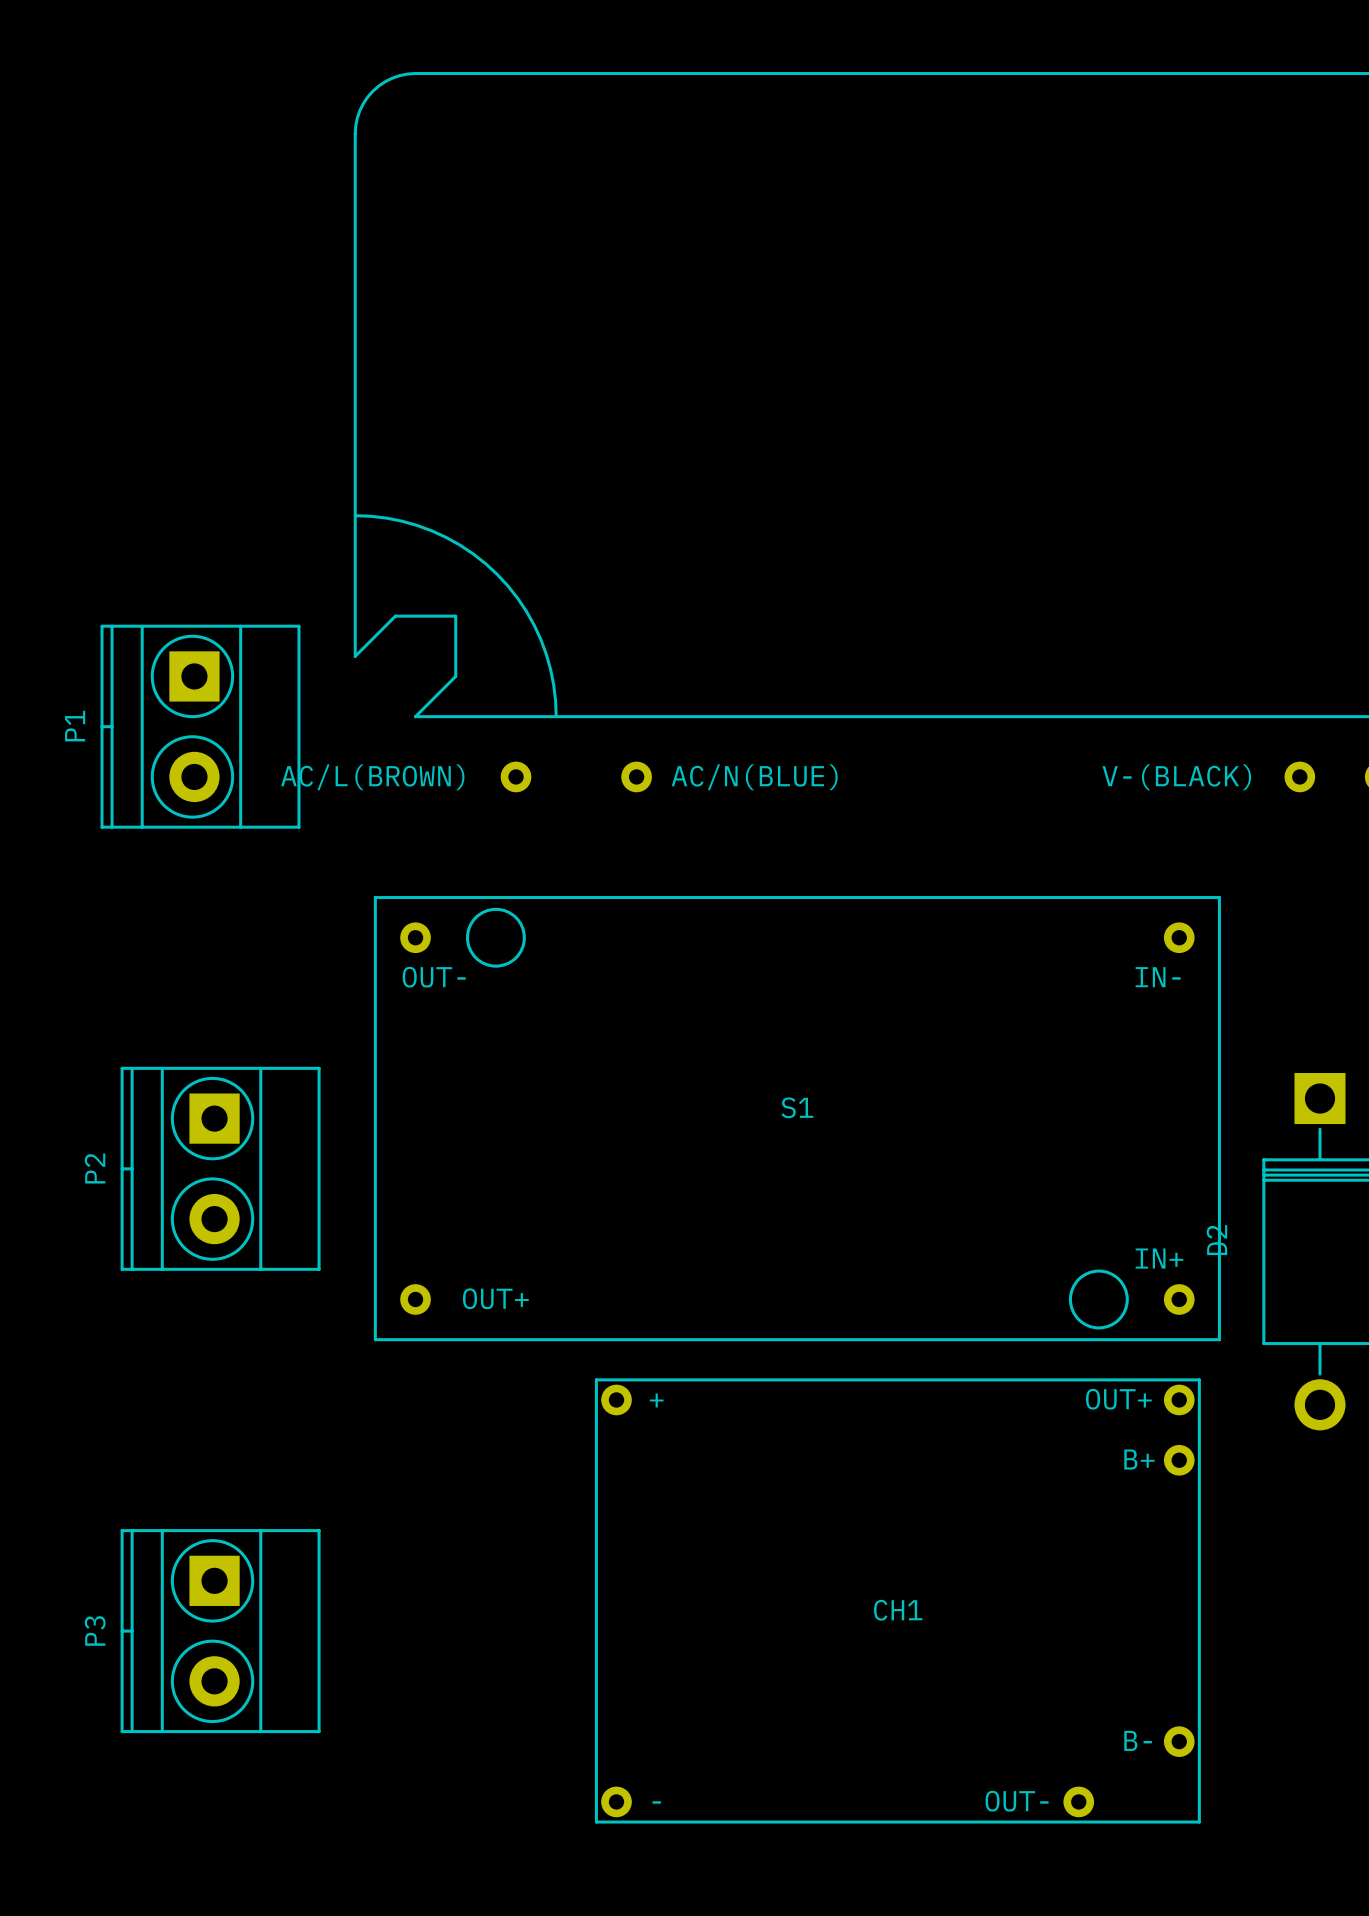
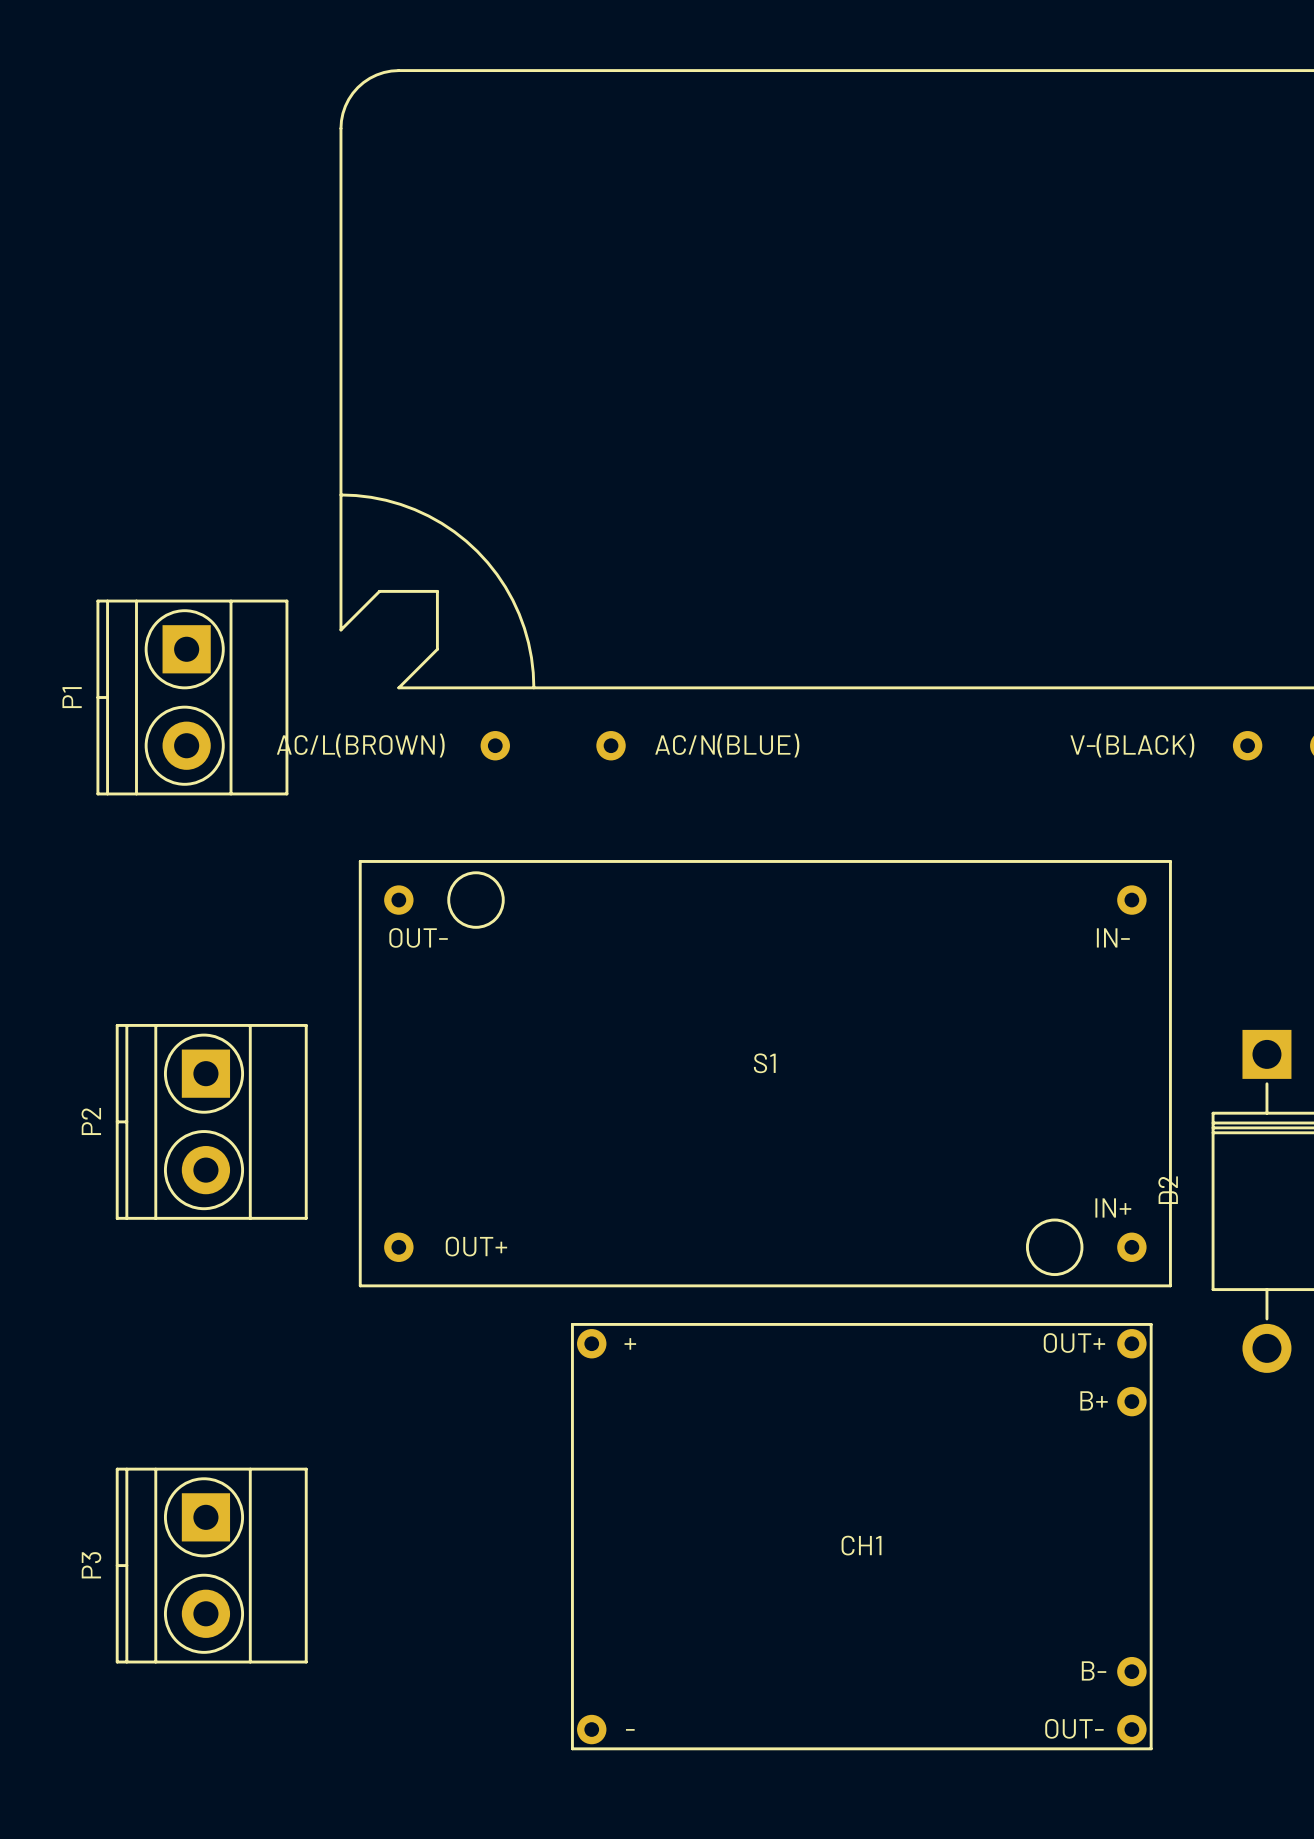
CH1 footprint: [594, 1378, 1201, 1824] -> [571, 1322, 1153, 1751]

